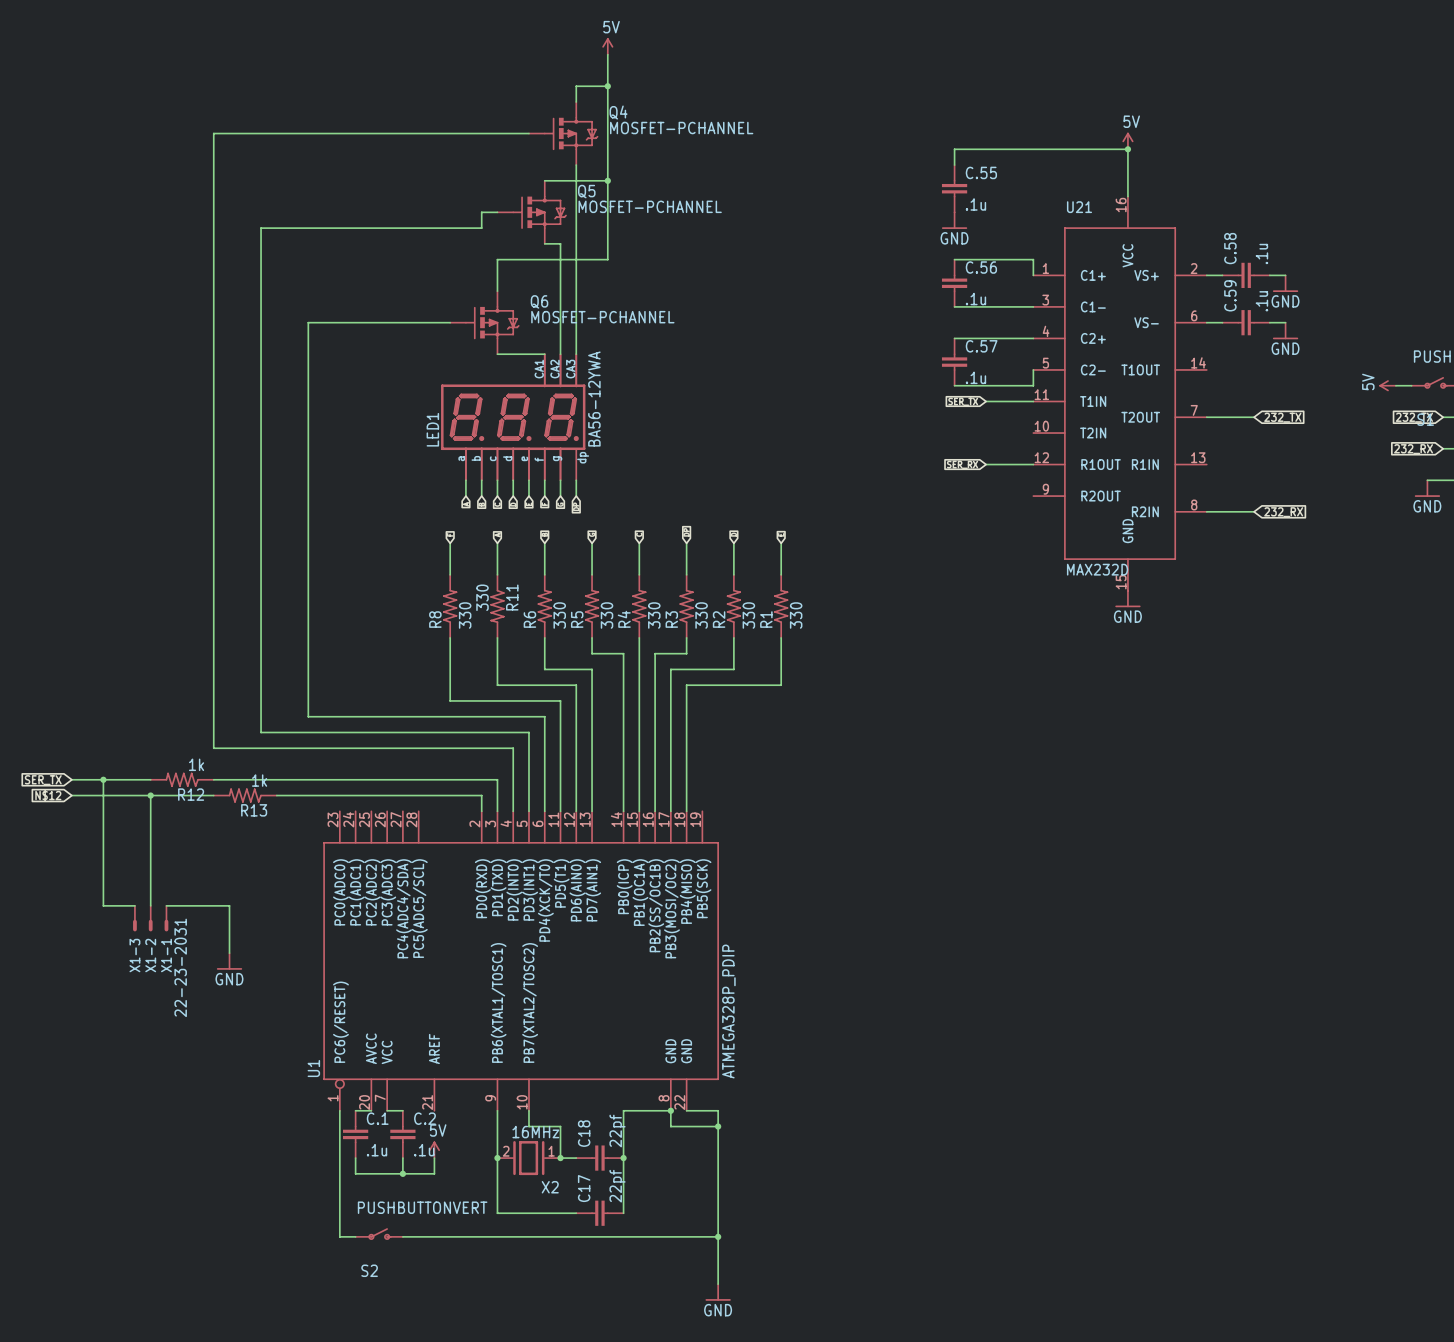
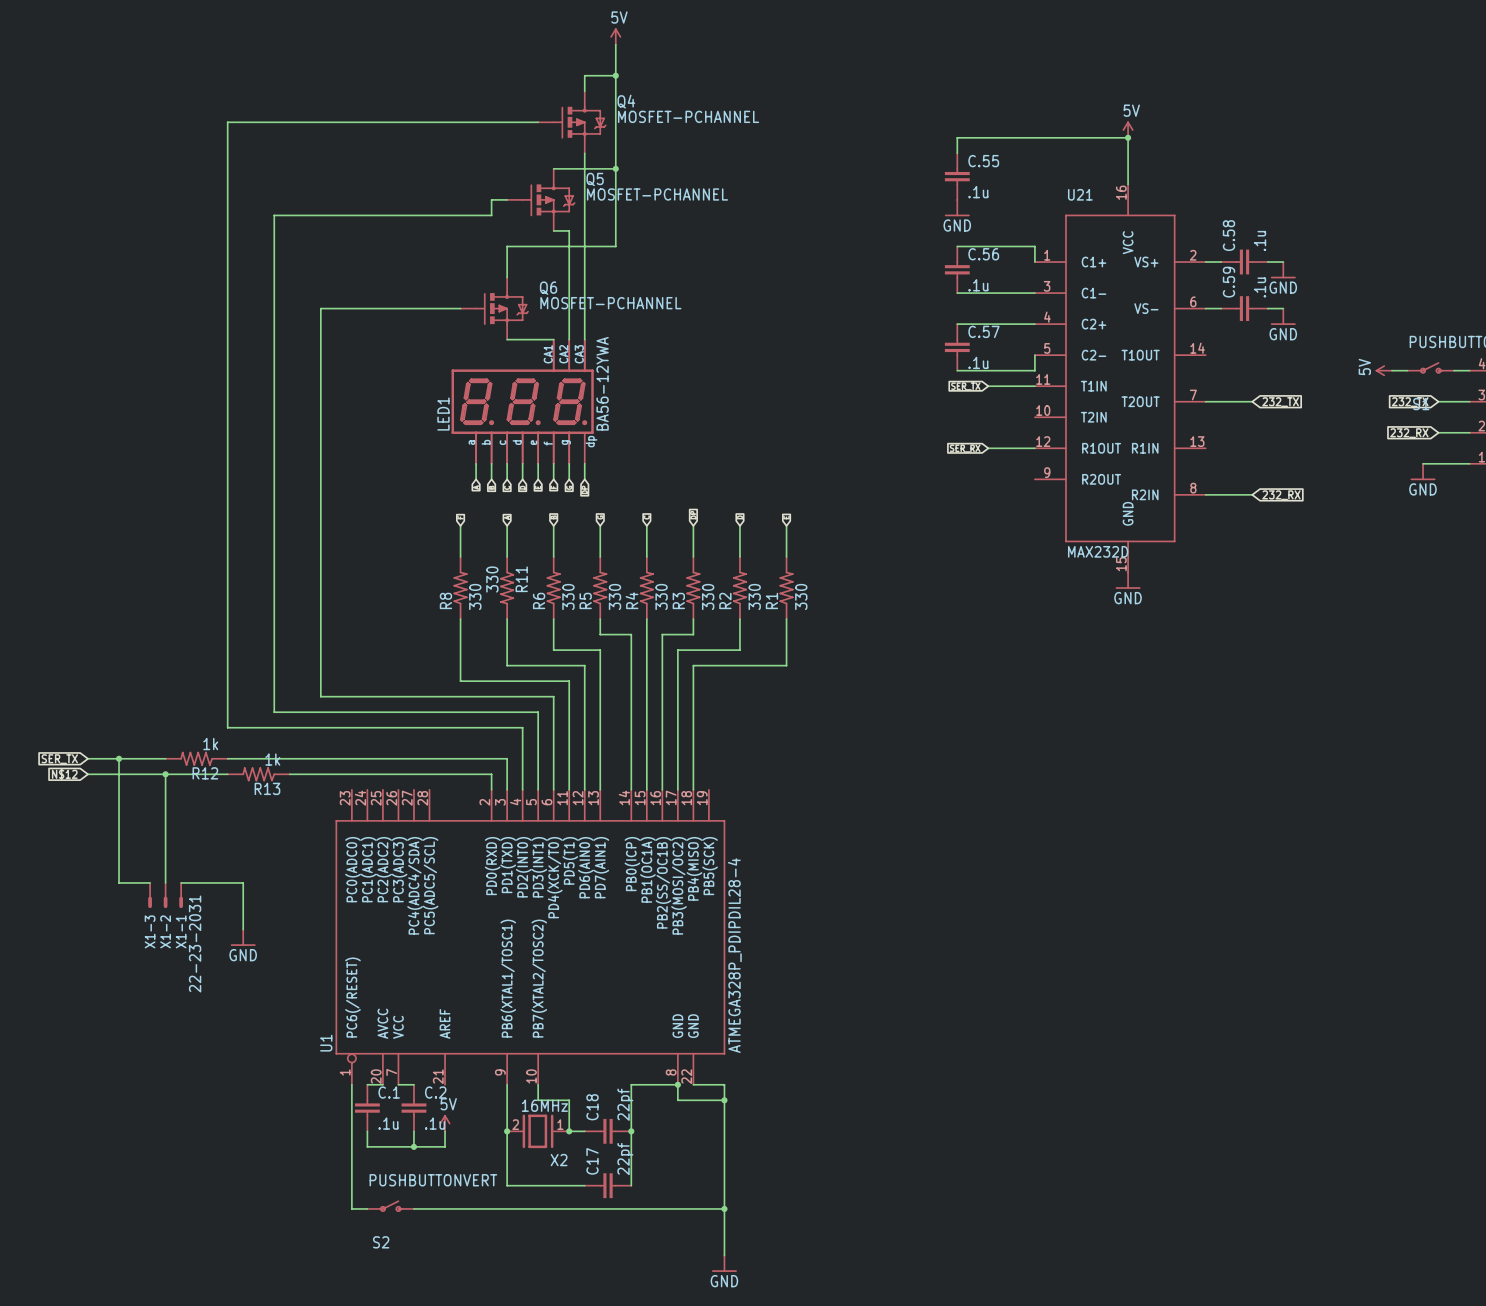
U1 value: ATMEGA328P_PDIP (728, 1011) -> ATMEGA328P_PDIPDIL28-4 (734, 955)

